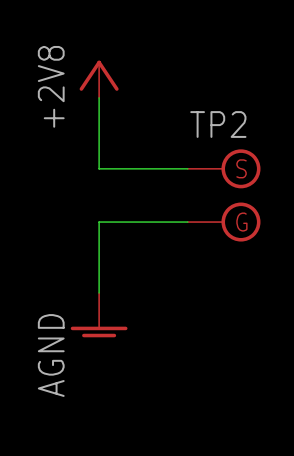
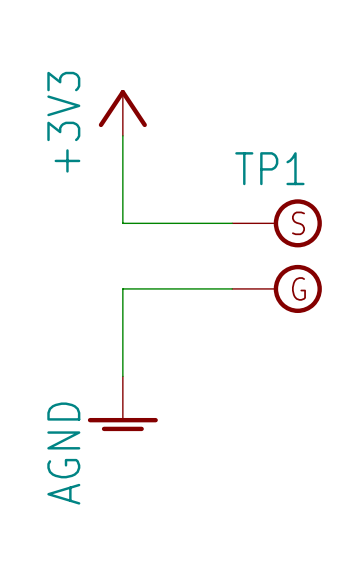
power symbol: +2V8 (99, 79) -> +3V3 (122, 112)
TP2 name: TP2 (218, 124) -> TP1 (269, 168)

